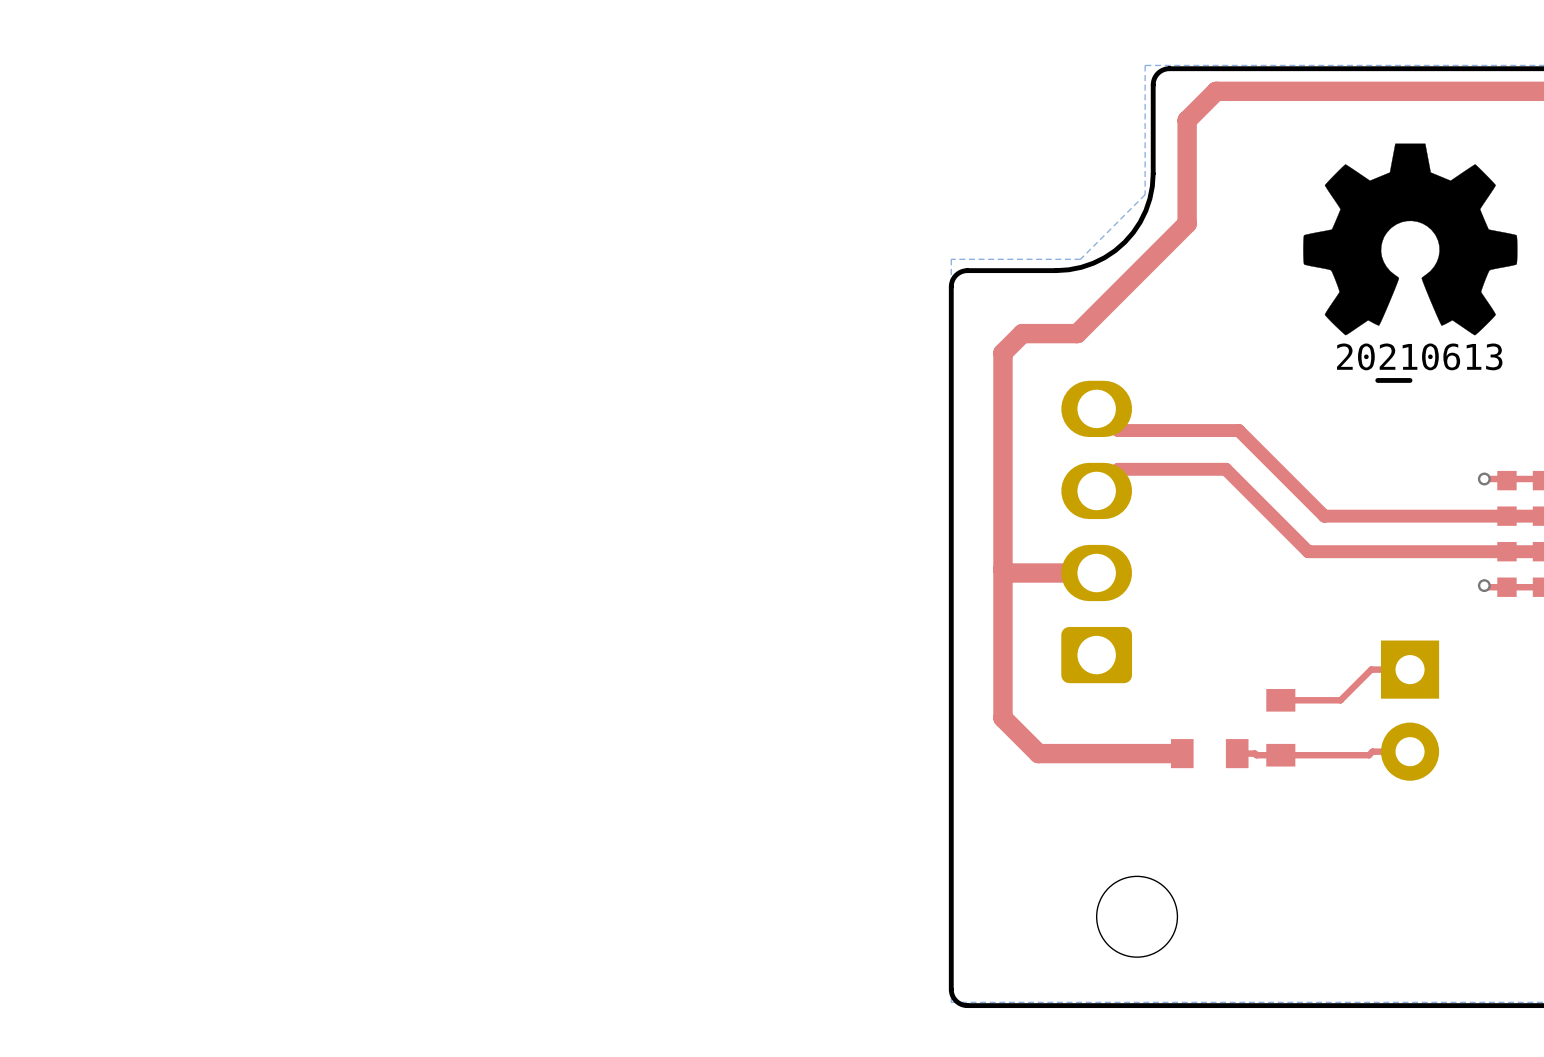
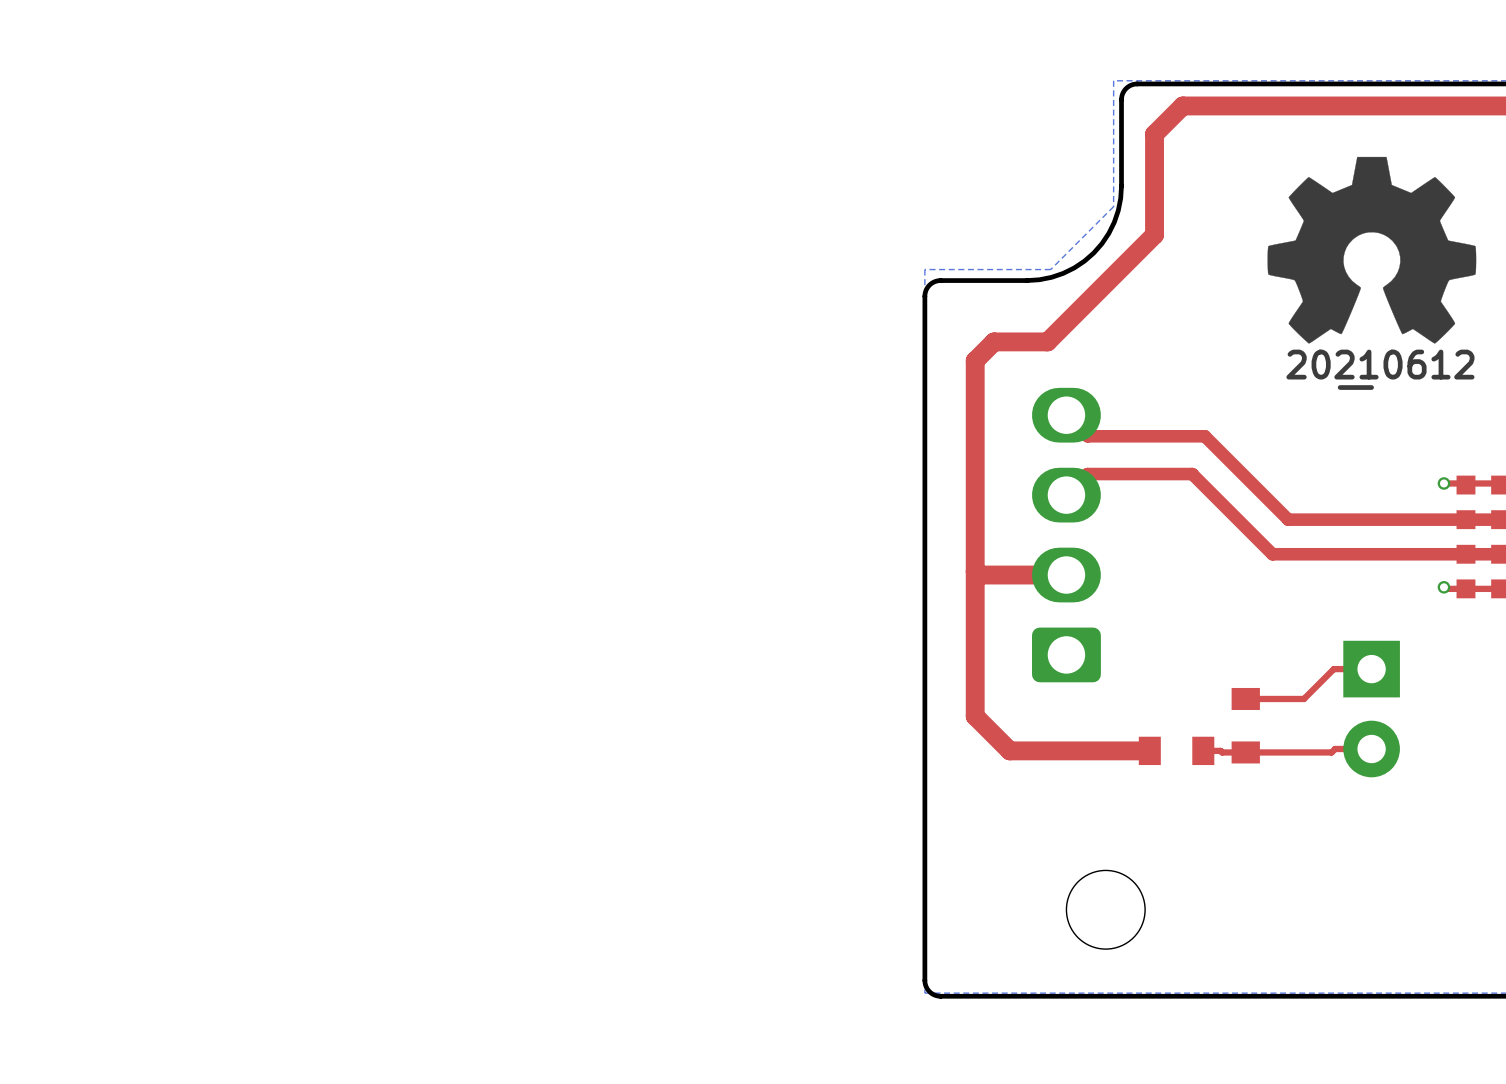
drawing shape: [1336, 343, 1503, 383] -> [1286, 349, 1475, 390]

